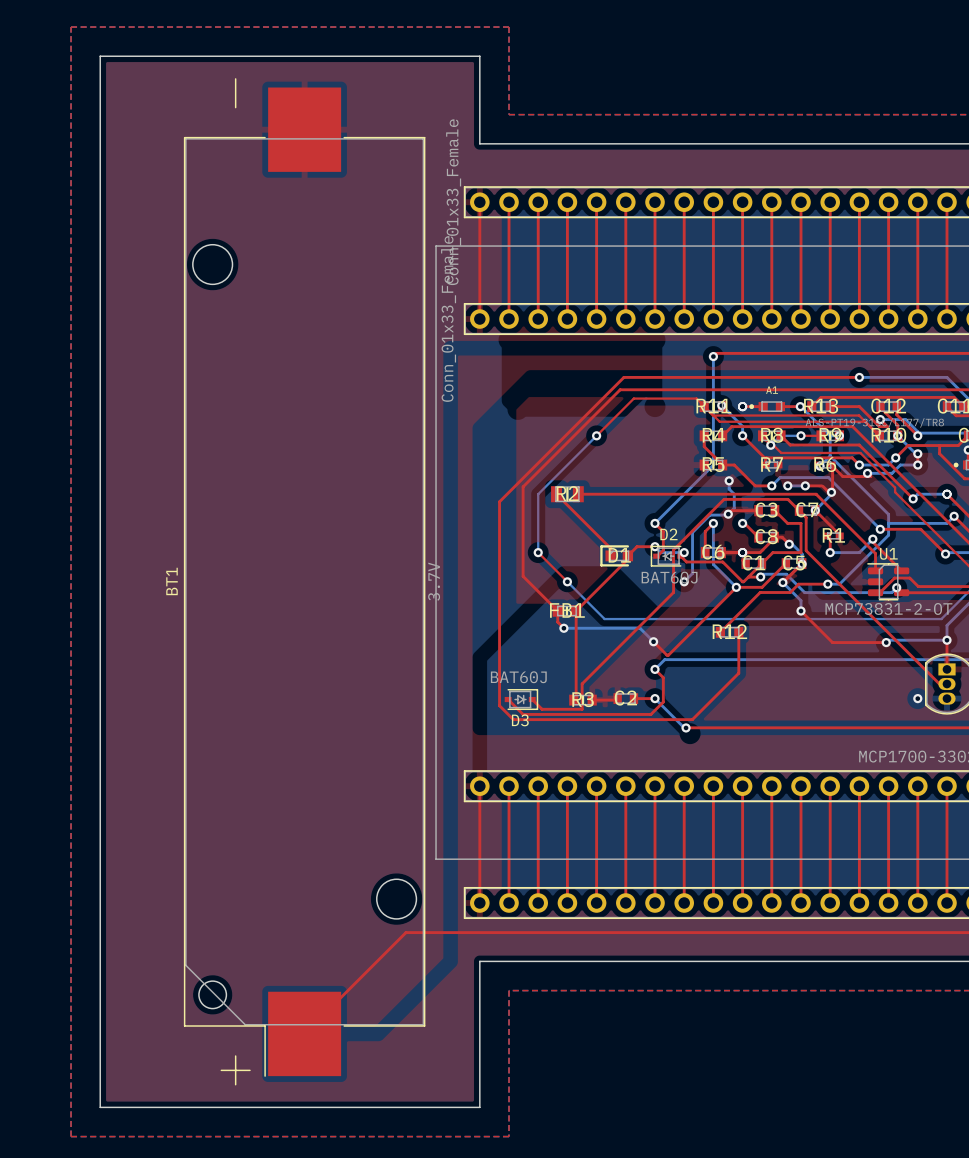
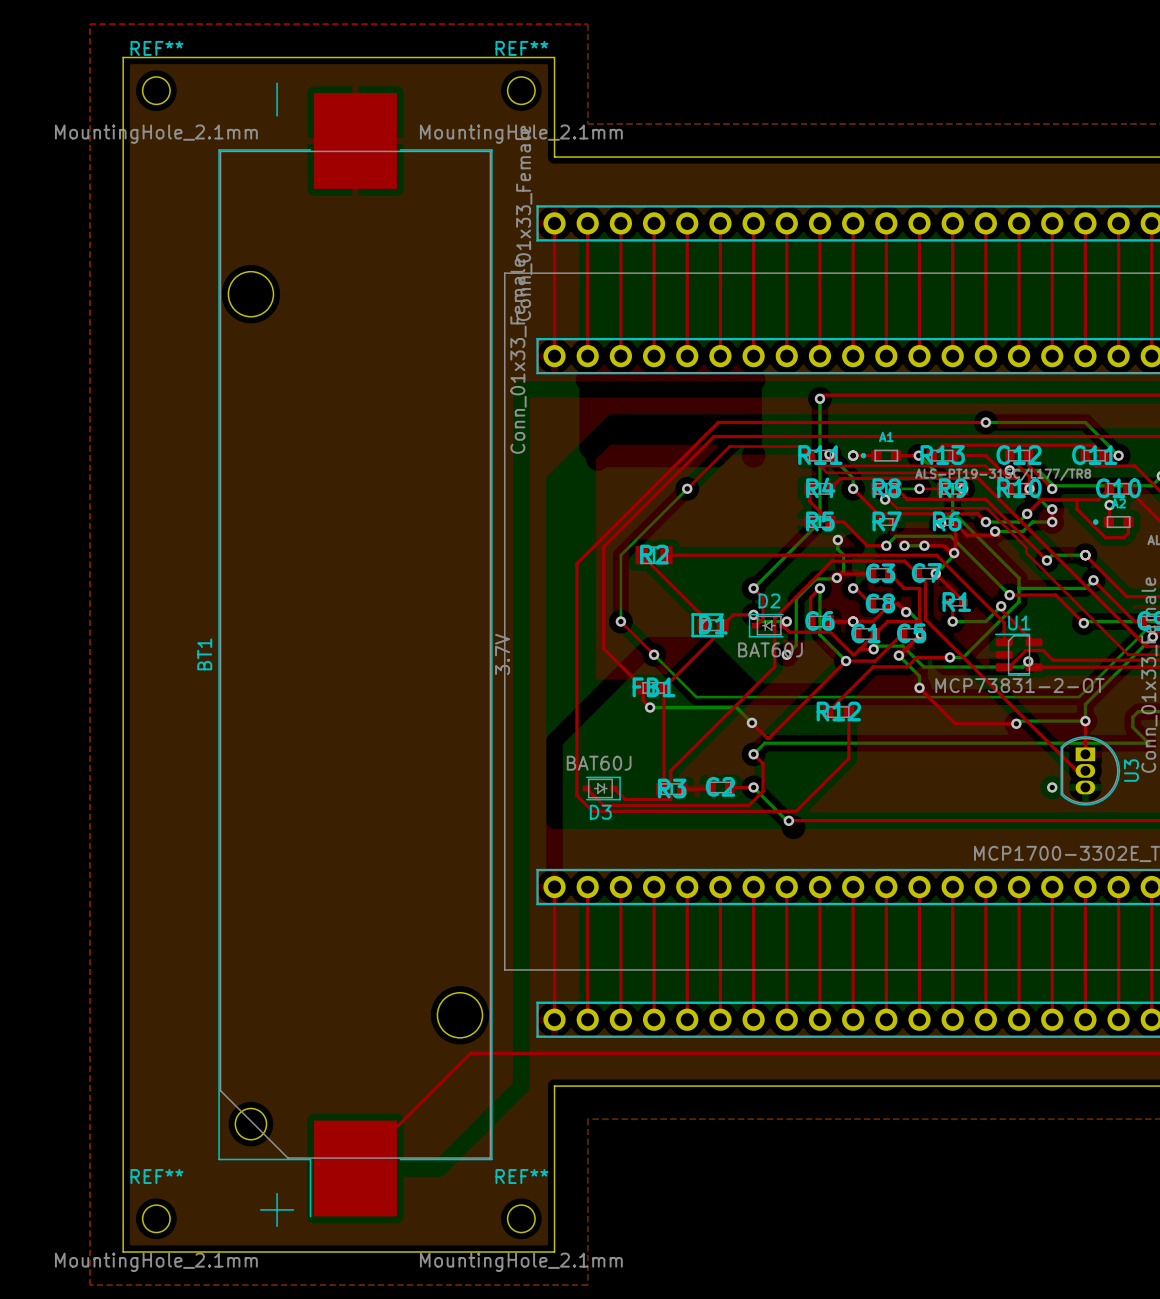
REF**: none -> MountingHole_2.1mm (156, 90)
REF**: none -> MountingHole_2.1mm (521, 90)
REF**: none -> MountingHole_2.1mm (156, 1218)
REF**: none -> MountingHole_2.1mm (521, 1218)

